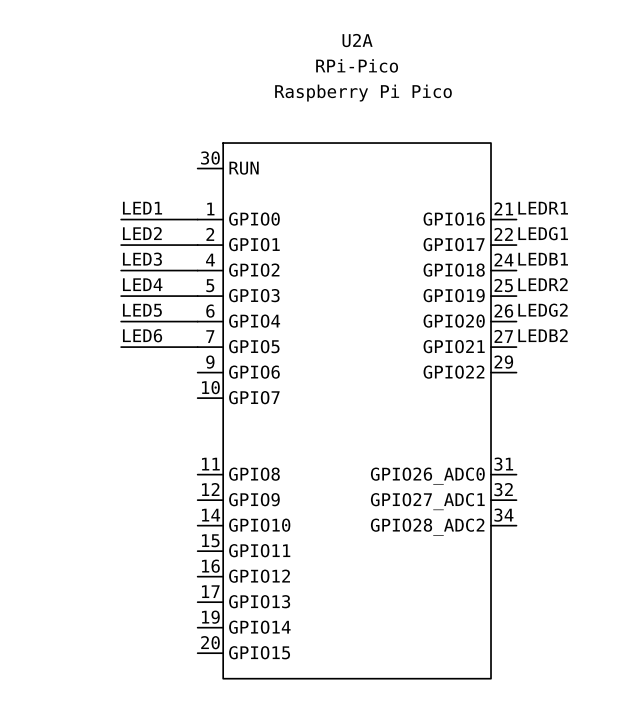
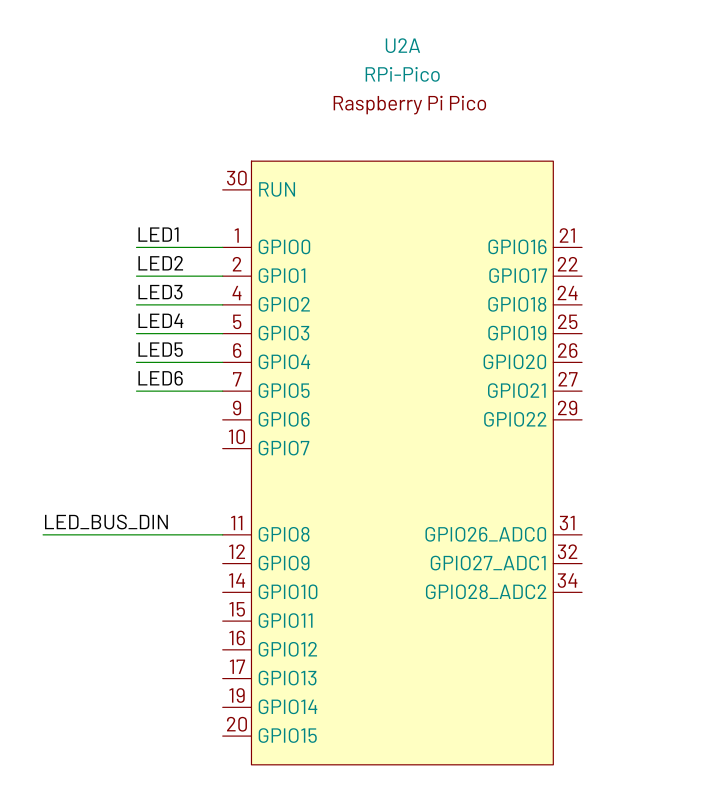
label: LEDR1 (543, 208) -> none
label: LEDG1 (543, 233) -> none
label: LEDB1 (543, 259) -> none
label: LEDR2 (543, 284) -> none
label: LEDG2 (543, 310) -> none
label: LEDB2 (543, 335) -> none
label: none -> LED_BUS_DIN (106, 522)
wire: none -> (43, 534) (222, 534)

